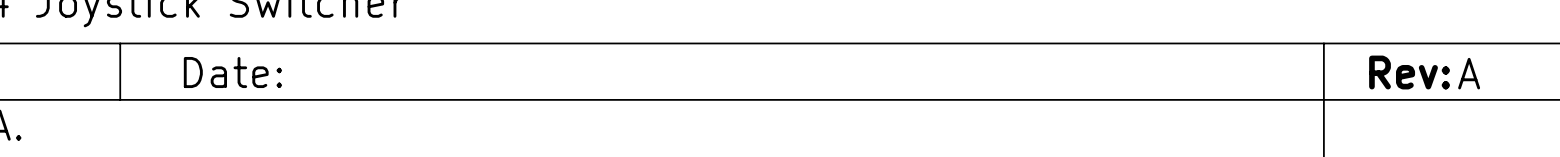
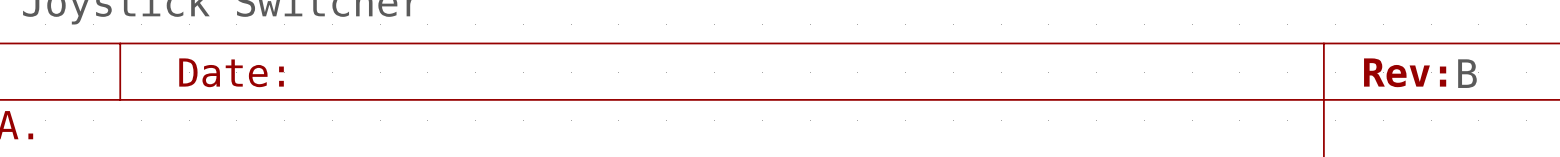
text: A (1469, 73) -> B (1467, 73)

